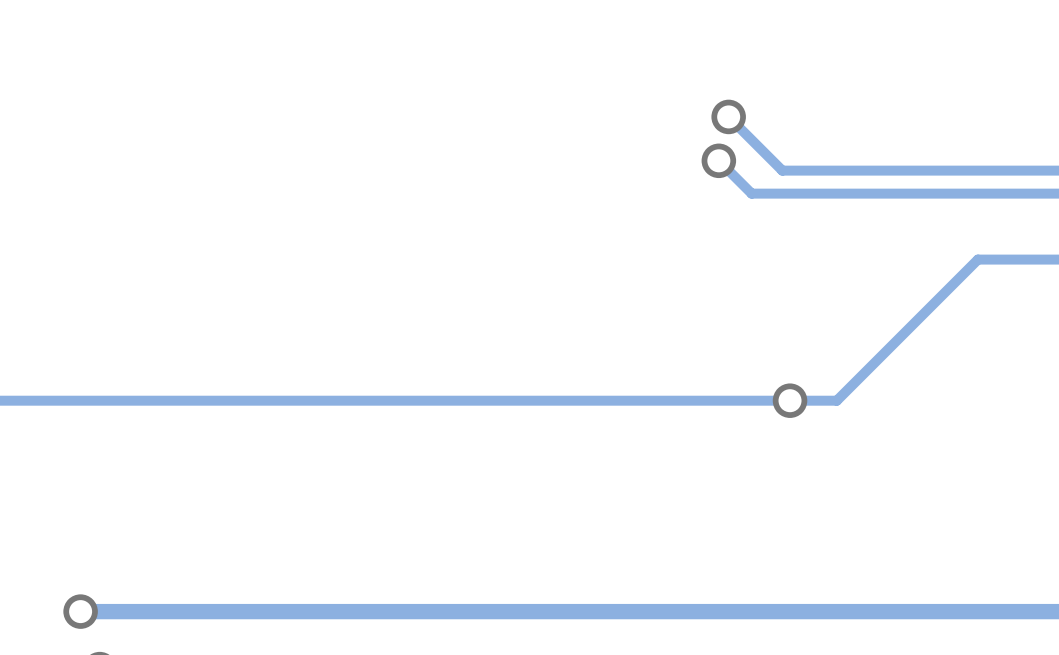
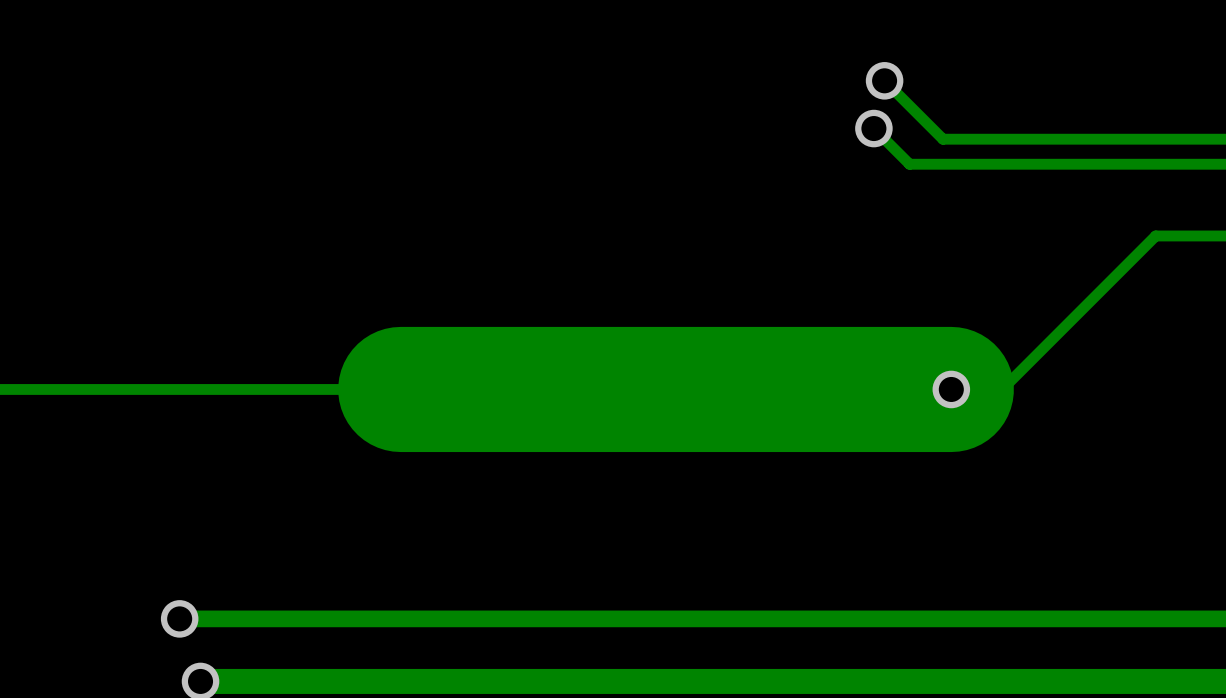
track width: thin (790, 400) (283, 400) -> thick (951, 389) (400, 389)

